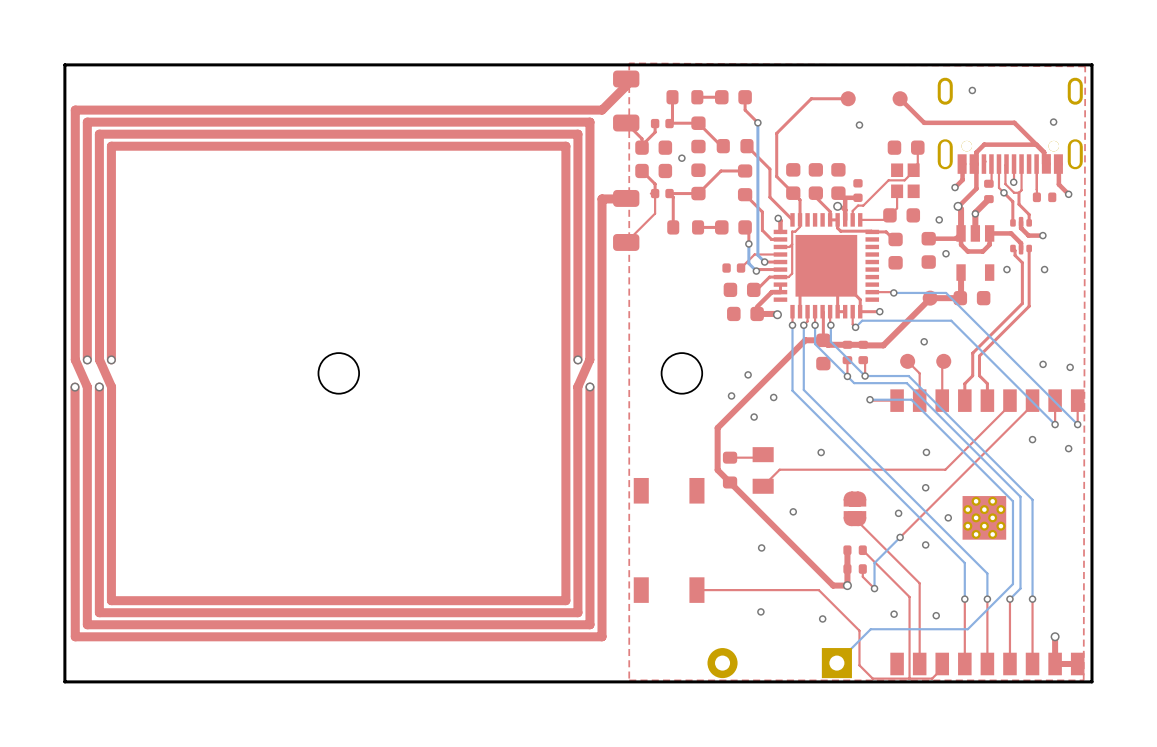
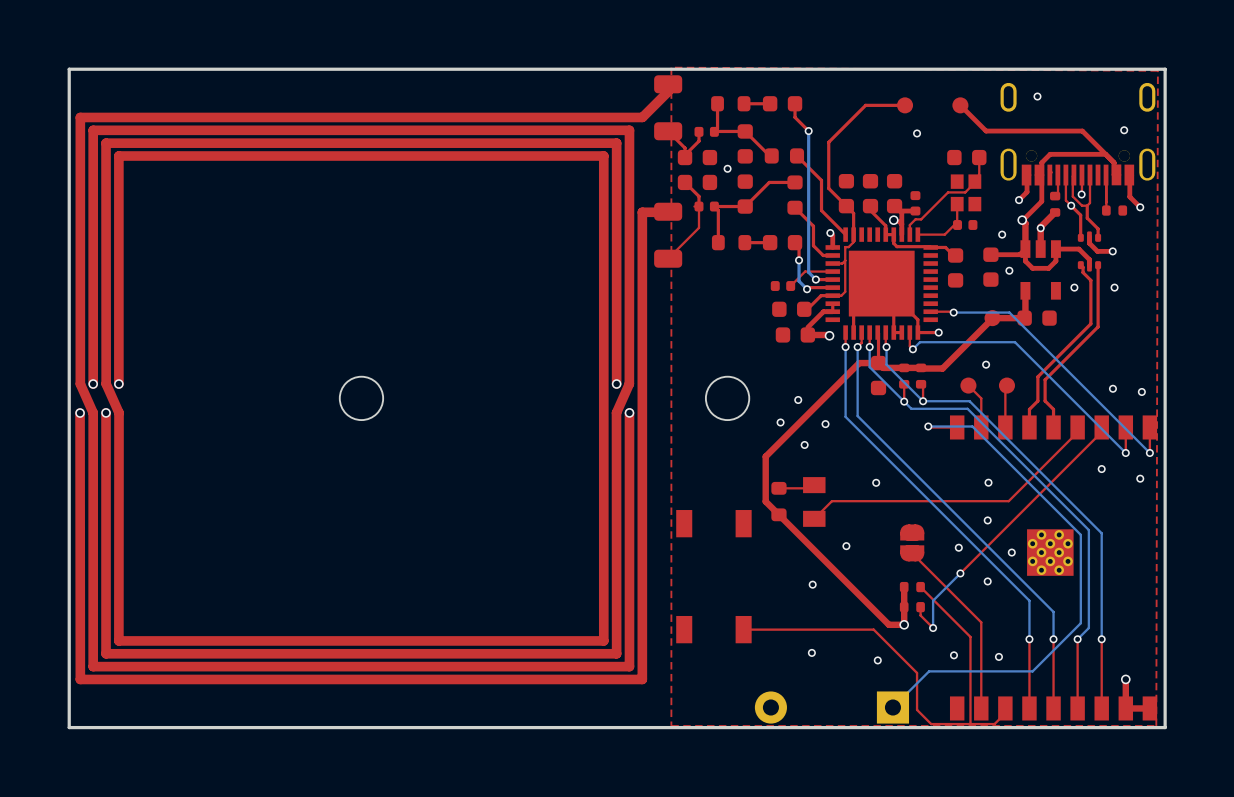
part footprint: [883, 208, 921, 223] -> [953, 220, 978, 230]

